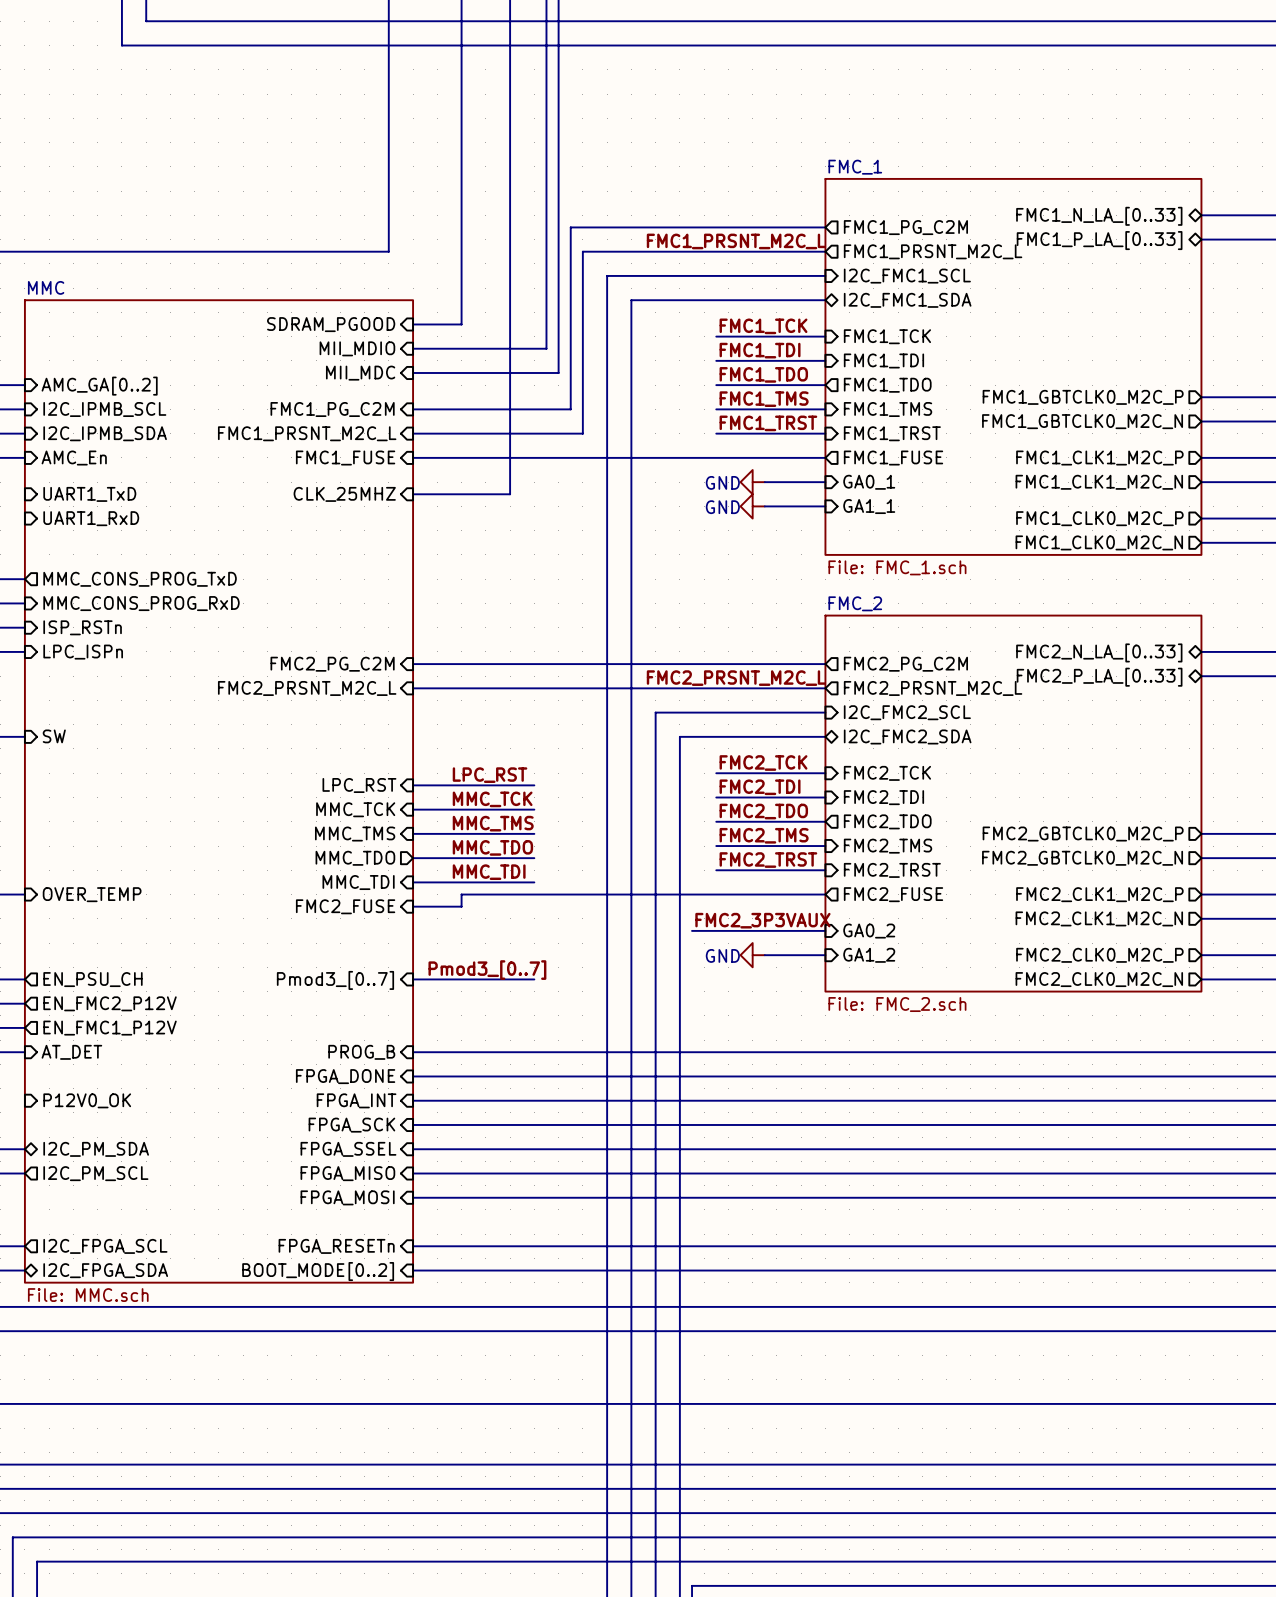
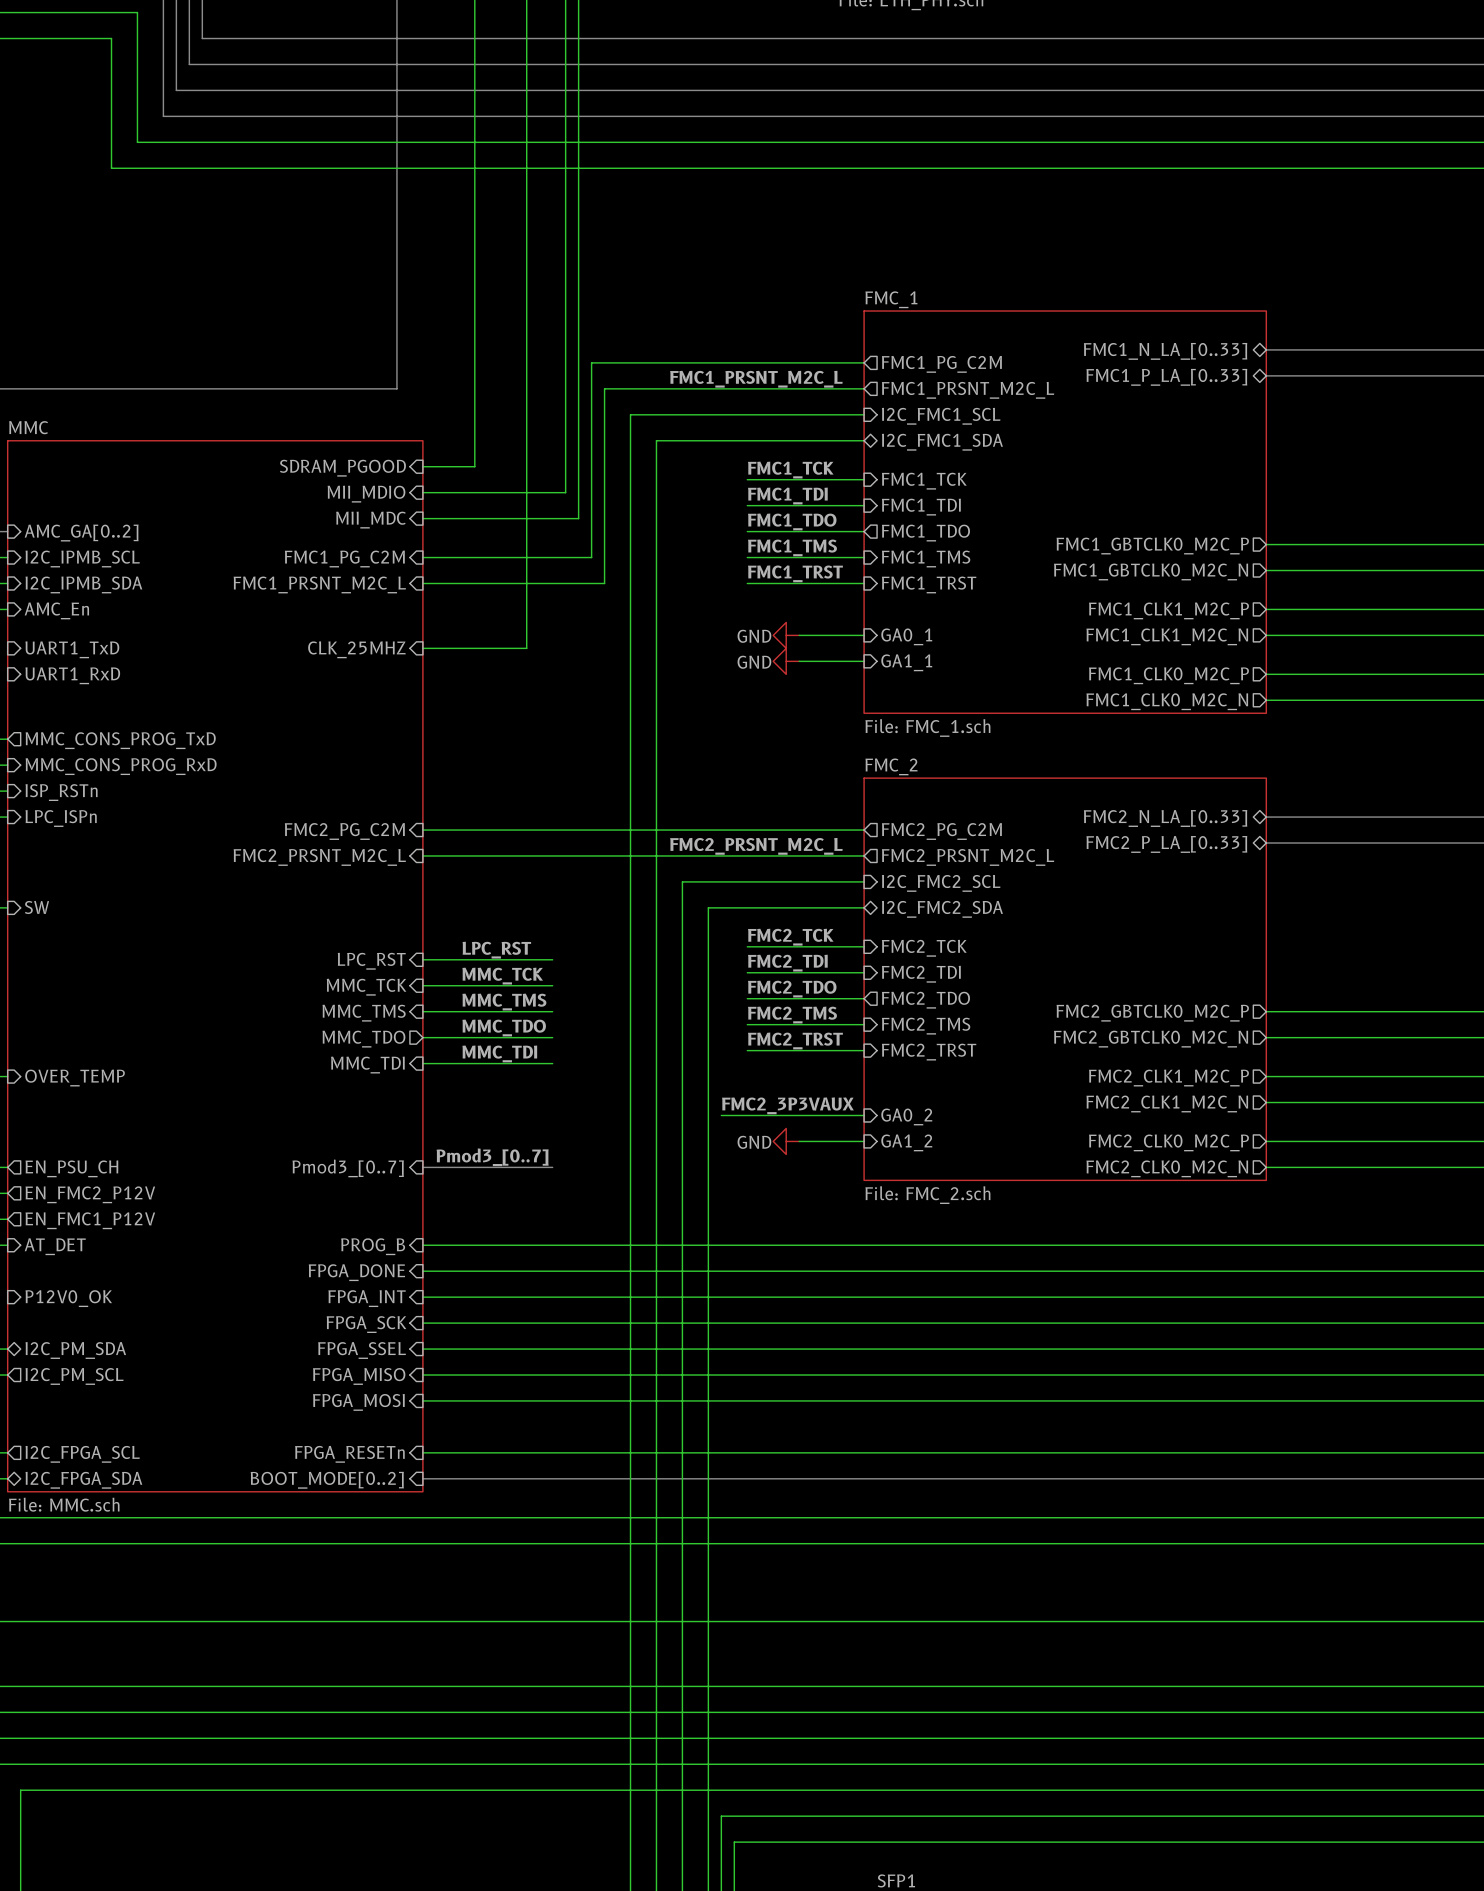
wire: (413, 457) (825, 457) -> none
sheet pin: FMC1_FUSE (345, 458) -> none
sheet pin: FMC1_FUSE (893, 458) -> none
wire: (825, 894) (461, 894) (461, 906) (413, 906) -> none
sheet pin: FMC2_FUSE (893, 894) -> none
sheet pin: FMC2_FUSE (345, 906) -> none

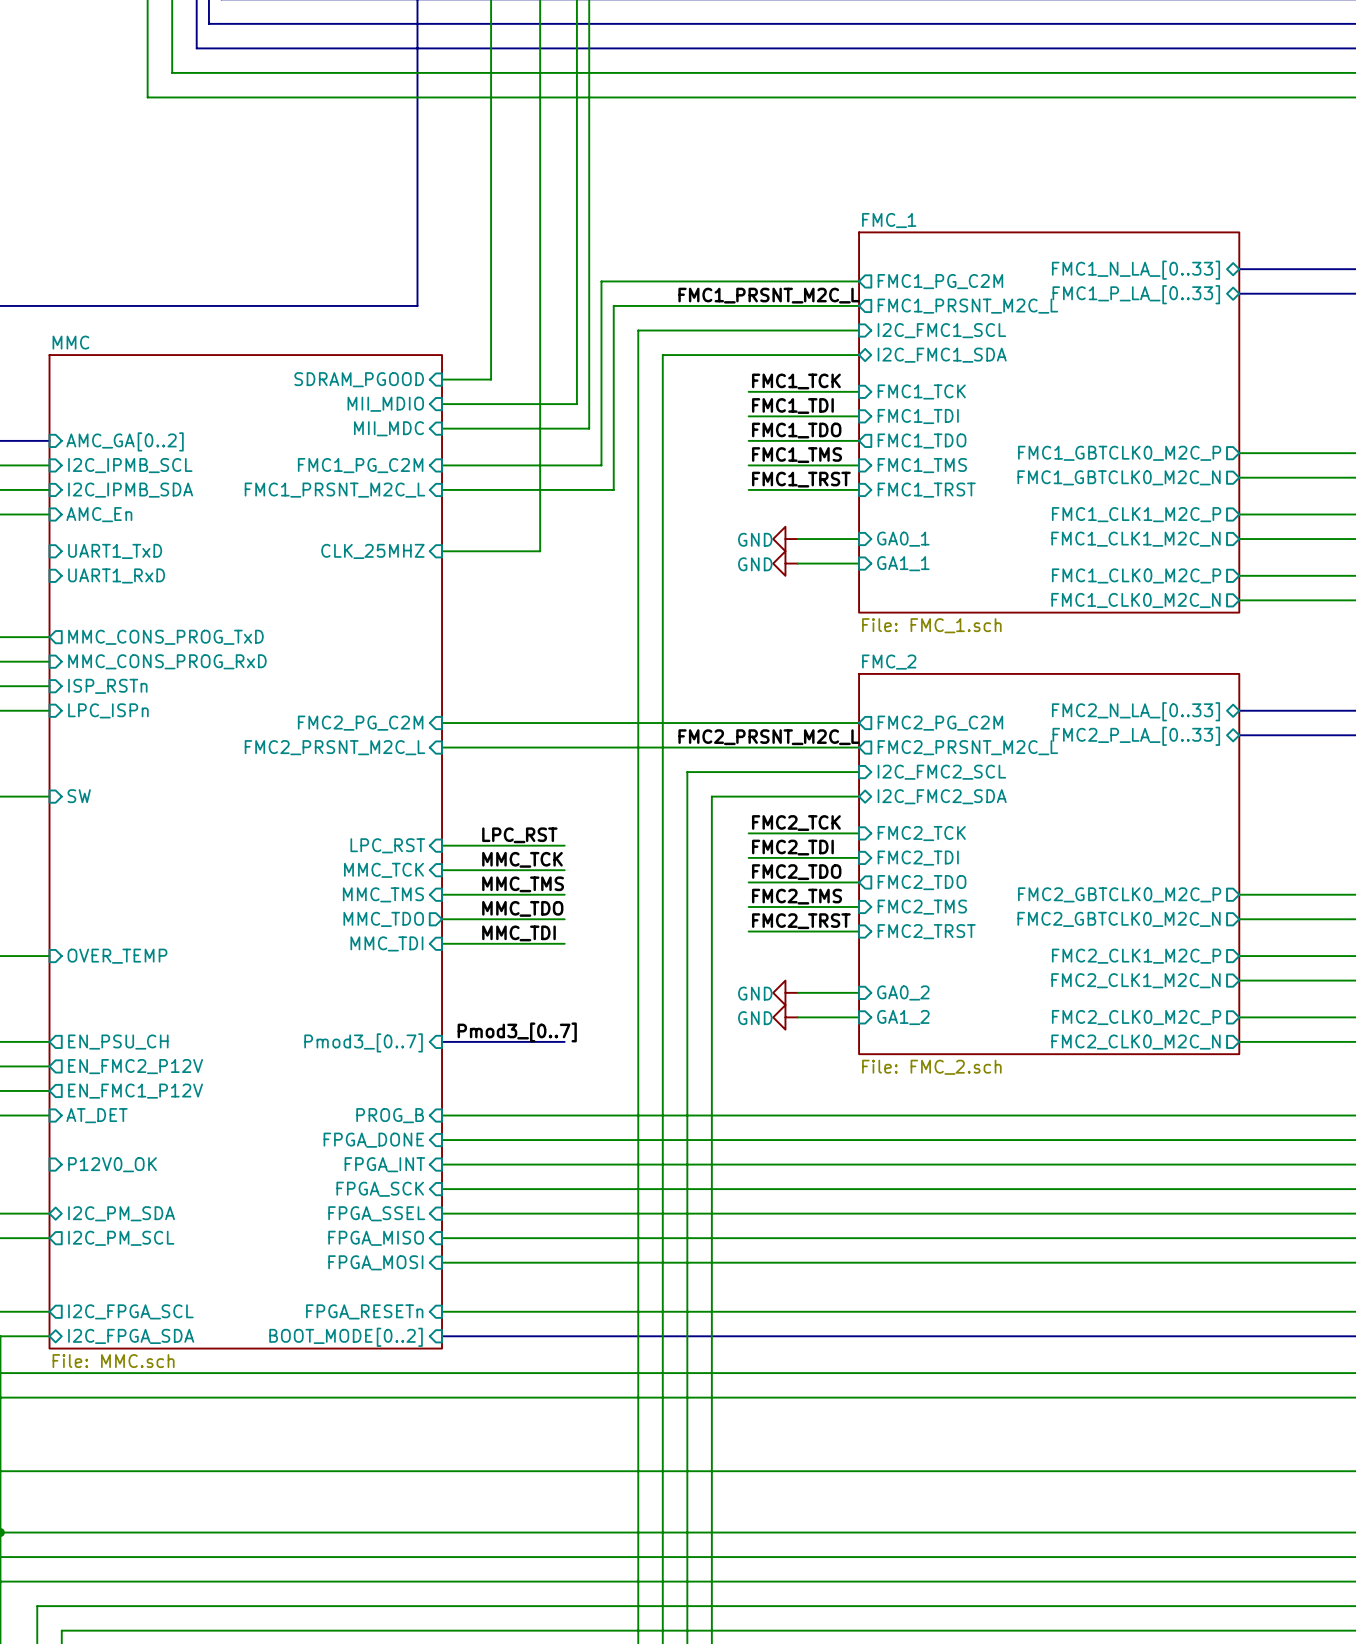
label: FMC2_3P3VAUX (787, 1105) -> none
wire: (721, 1115) (799, 1115) -> none
power symbol: none -> GND (785, 992)

